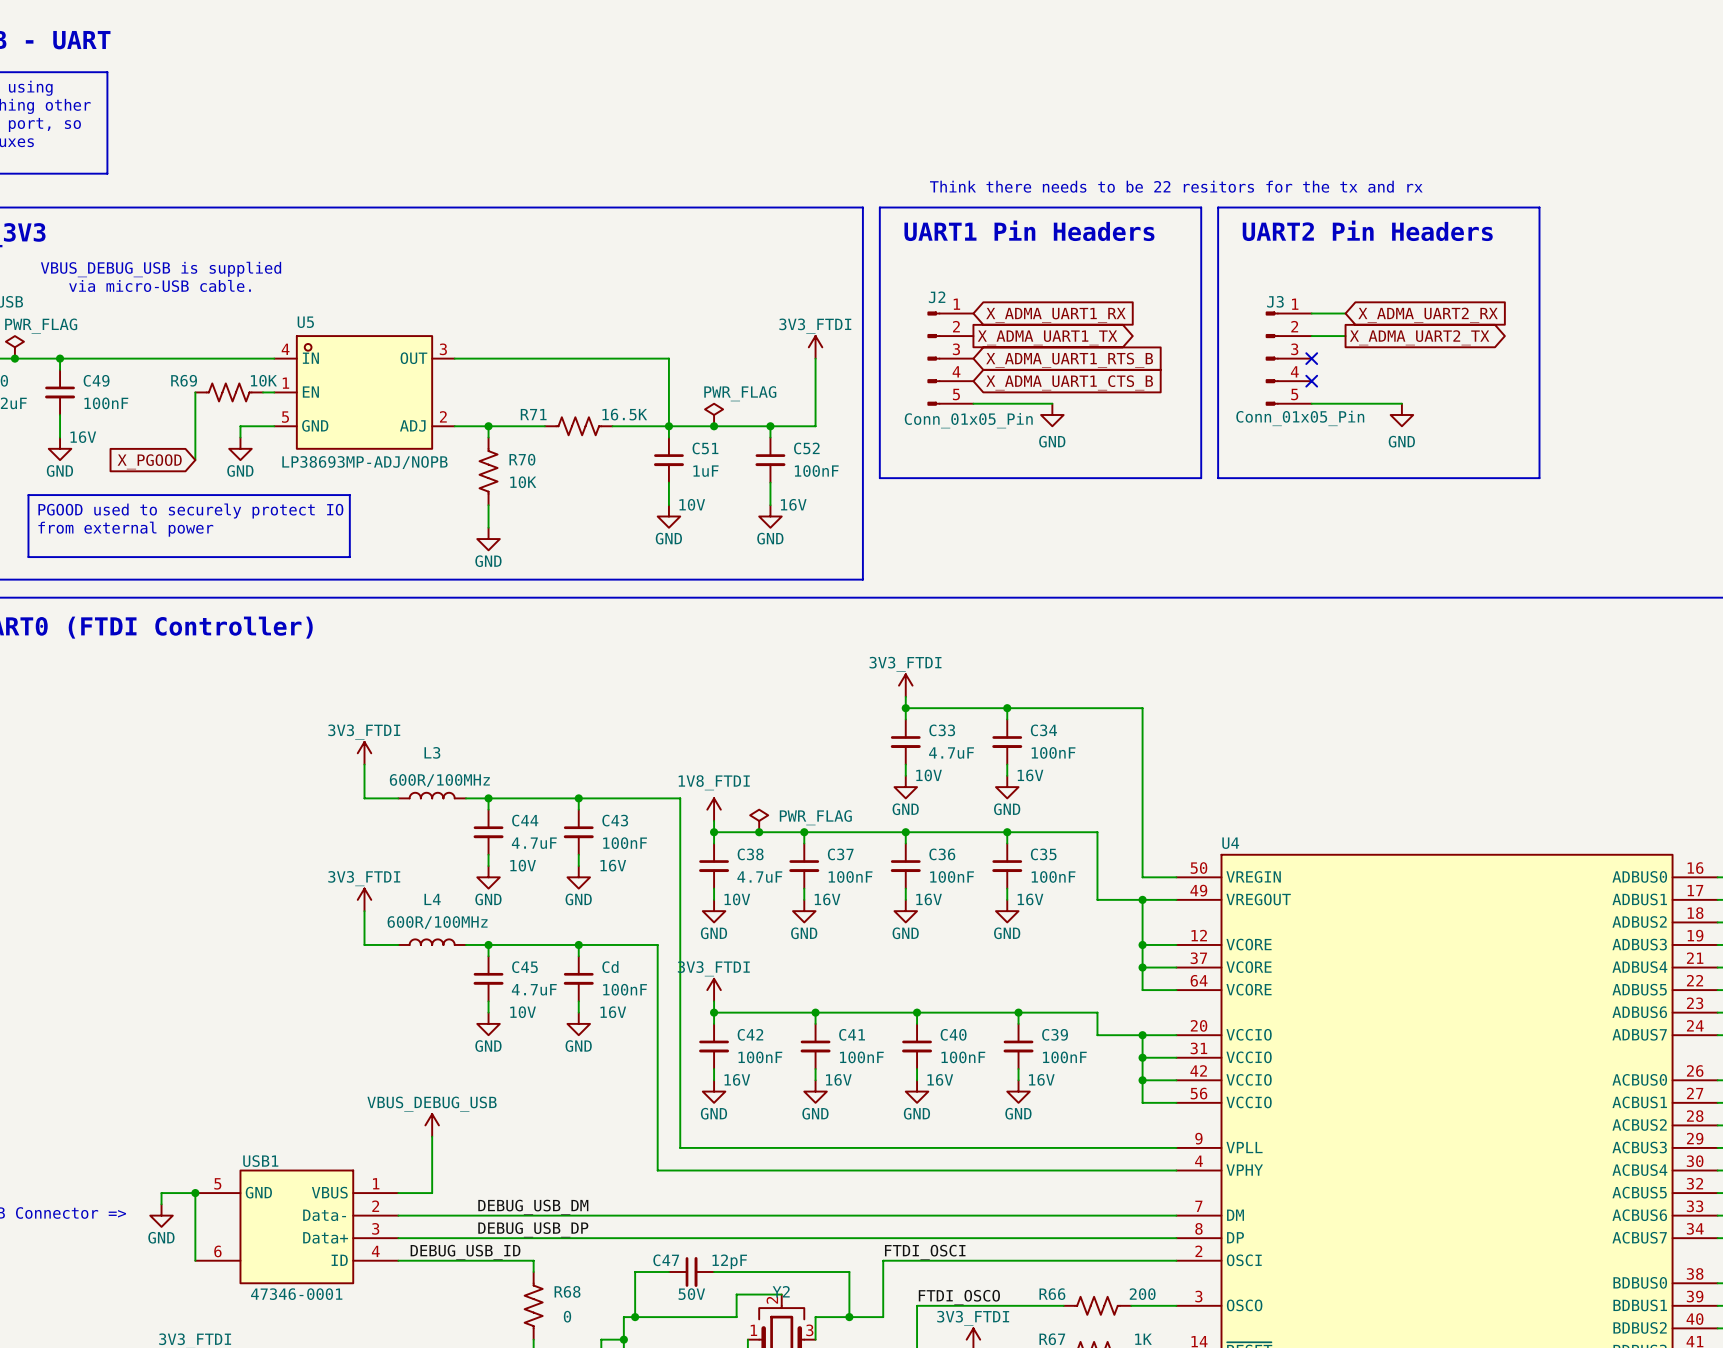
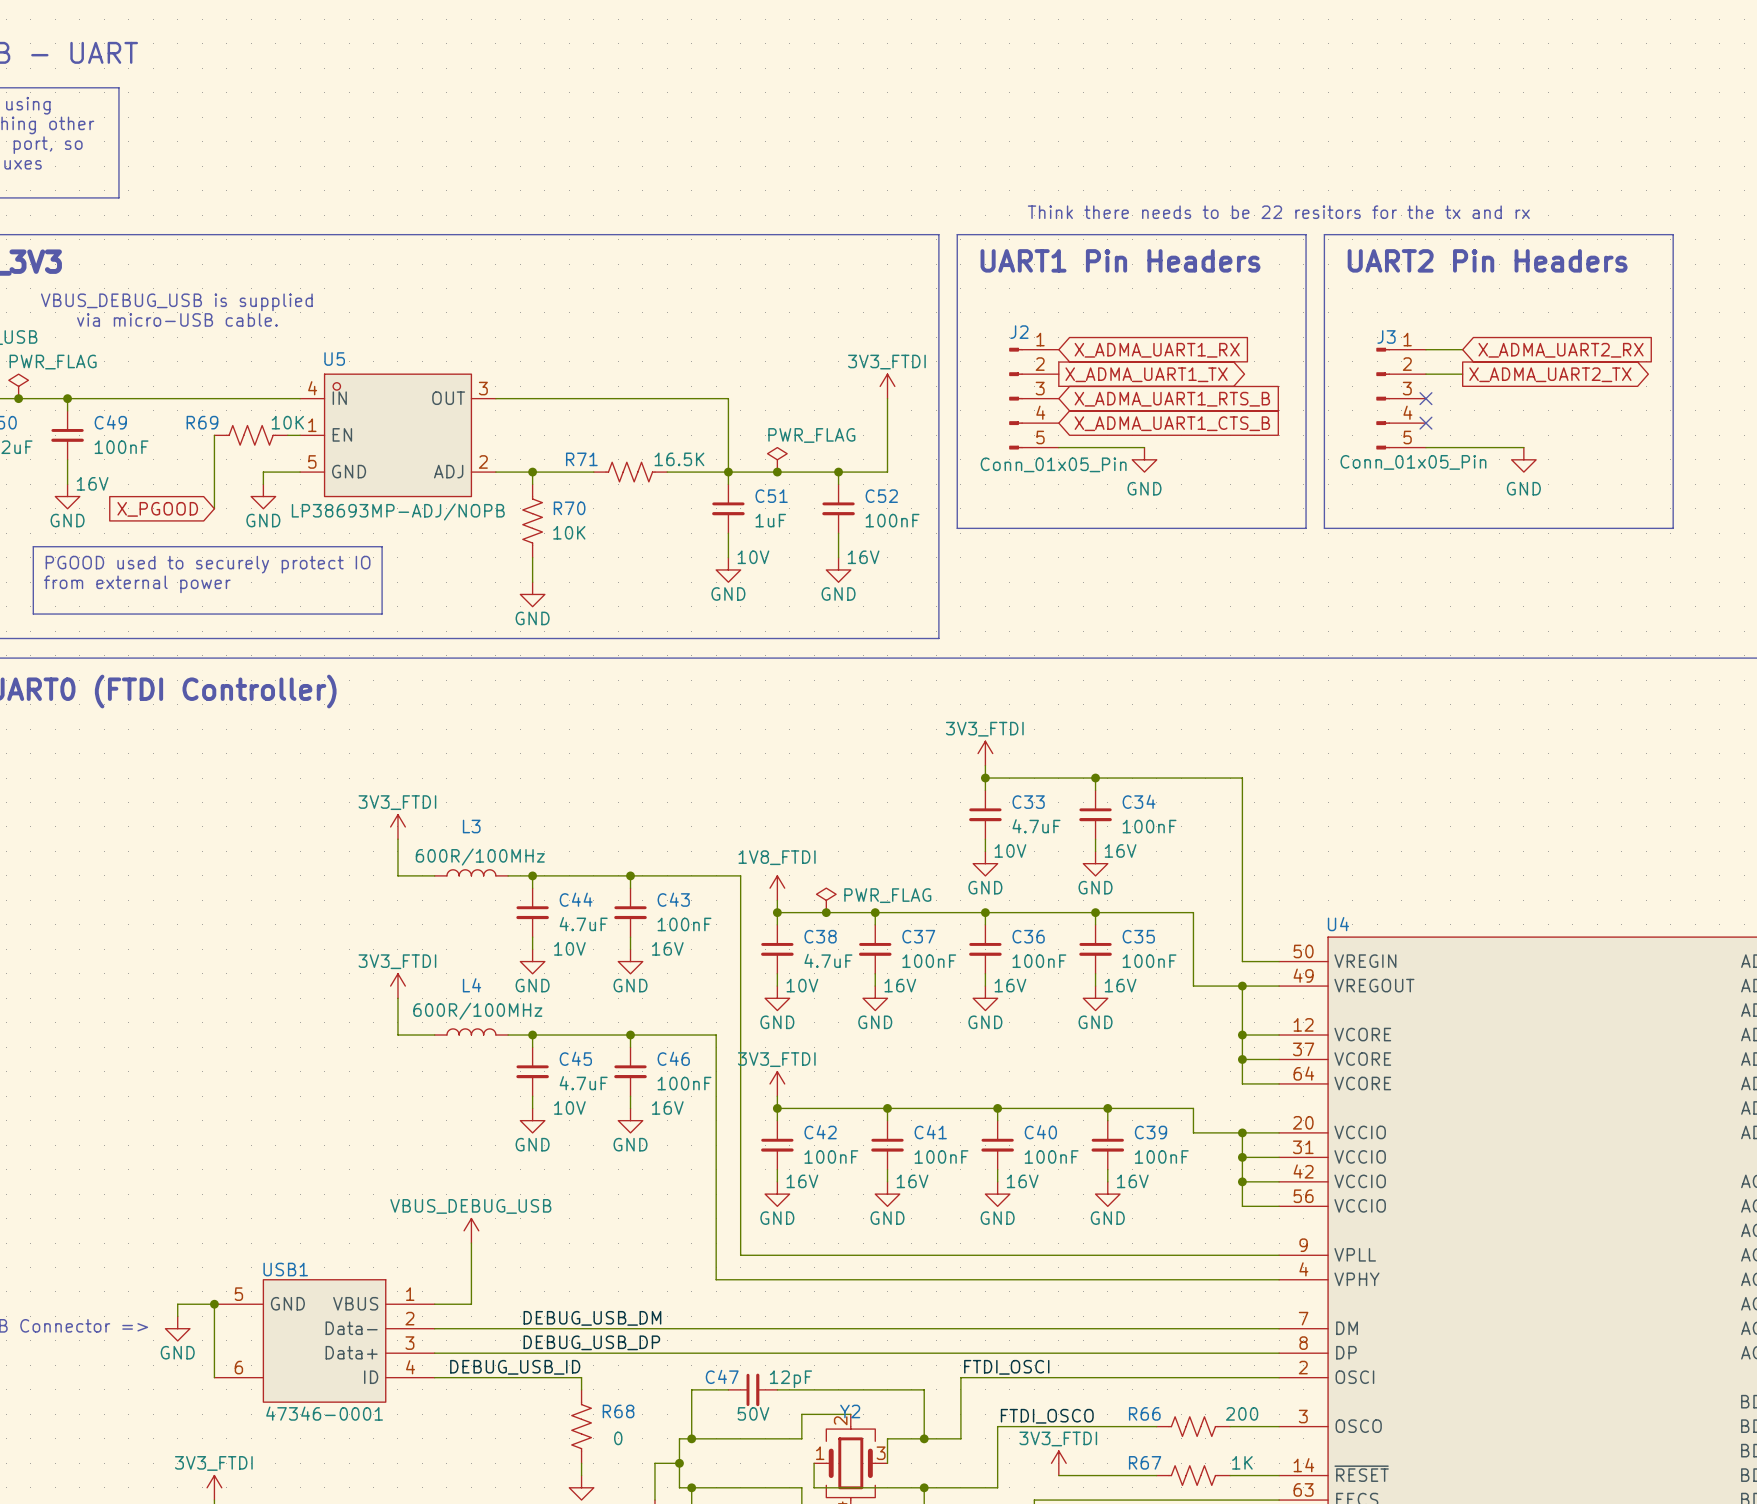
Cd name: Cd (610, 967) -> C46 (673, 1058)

